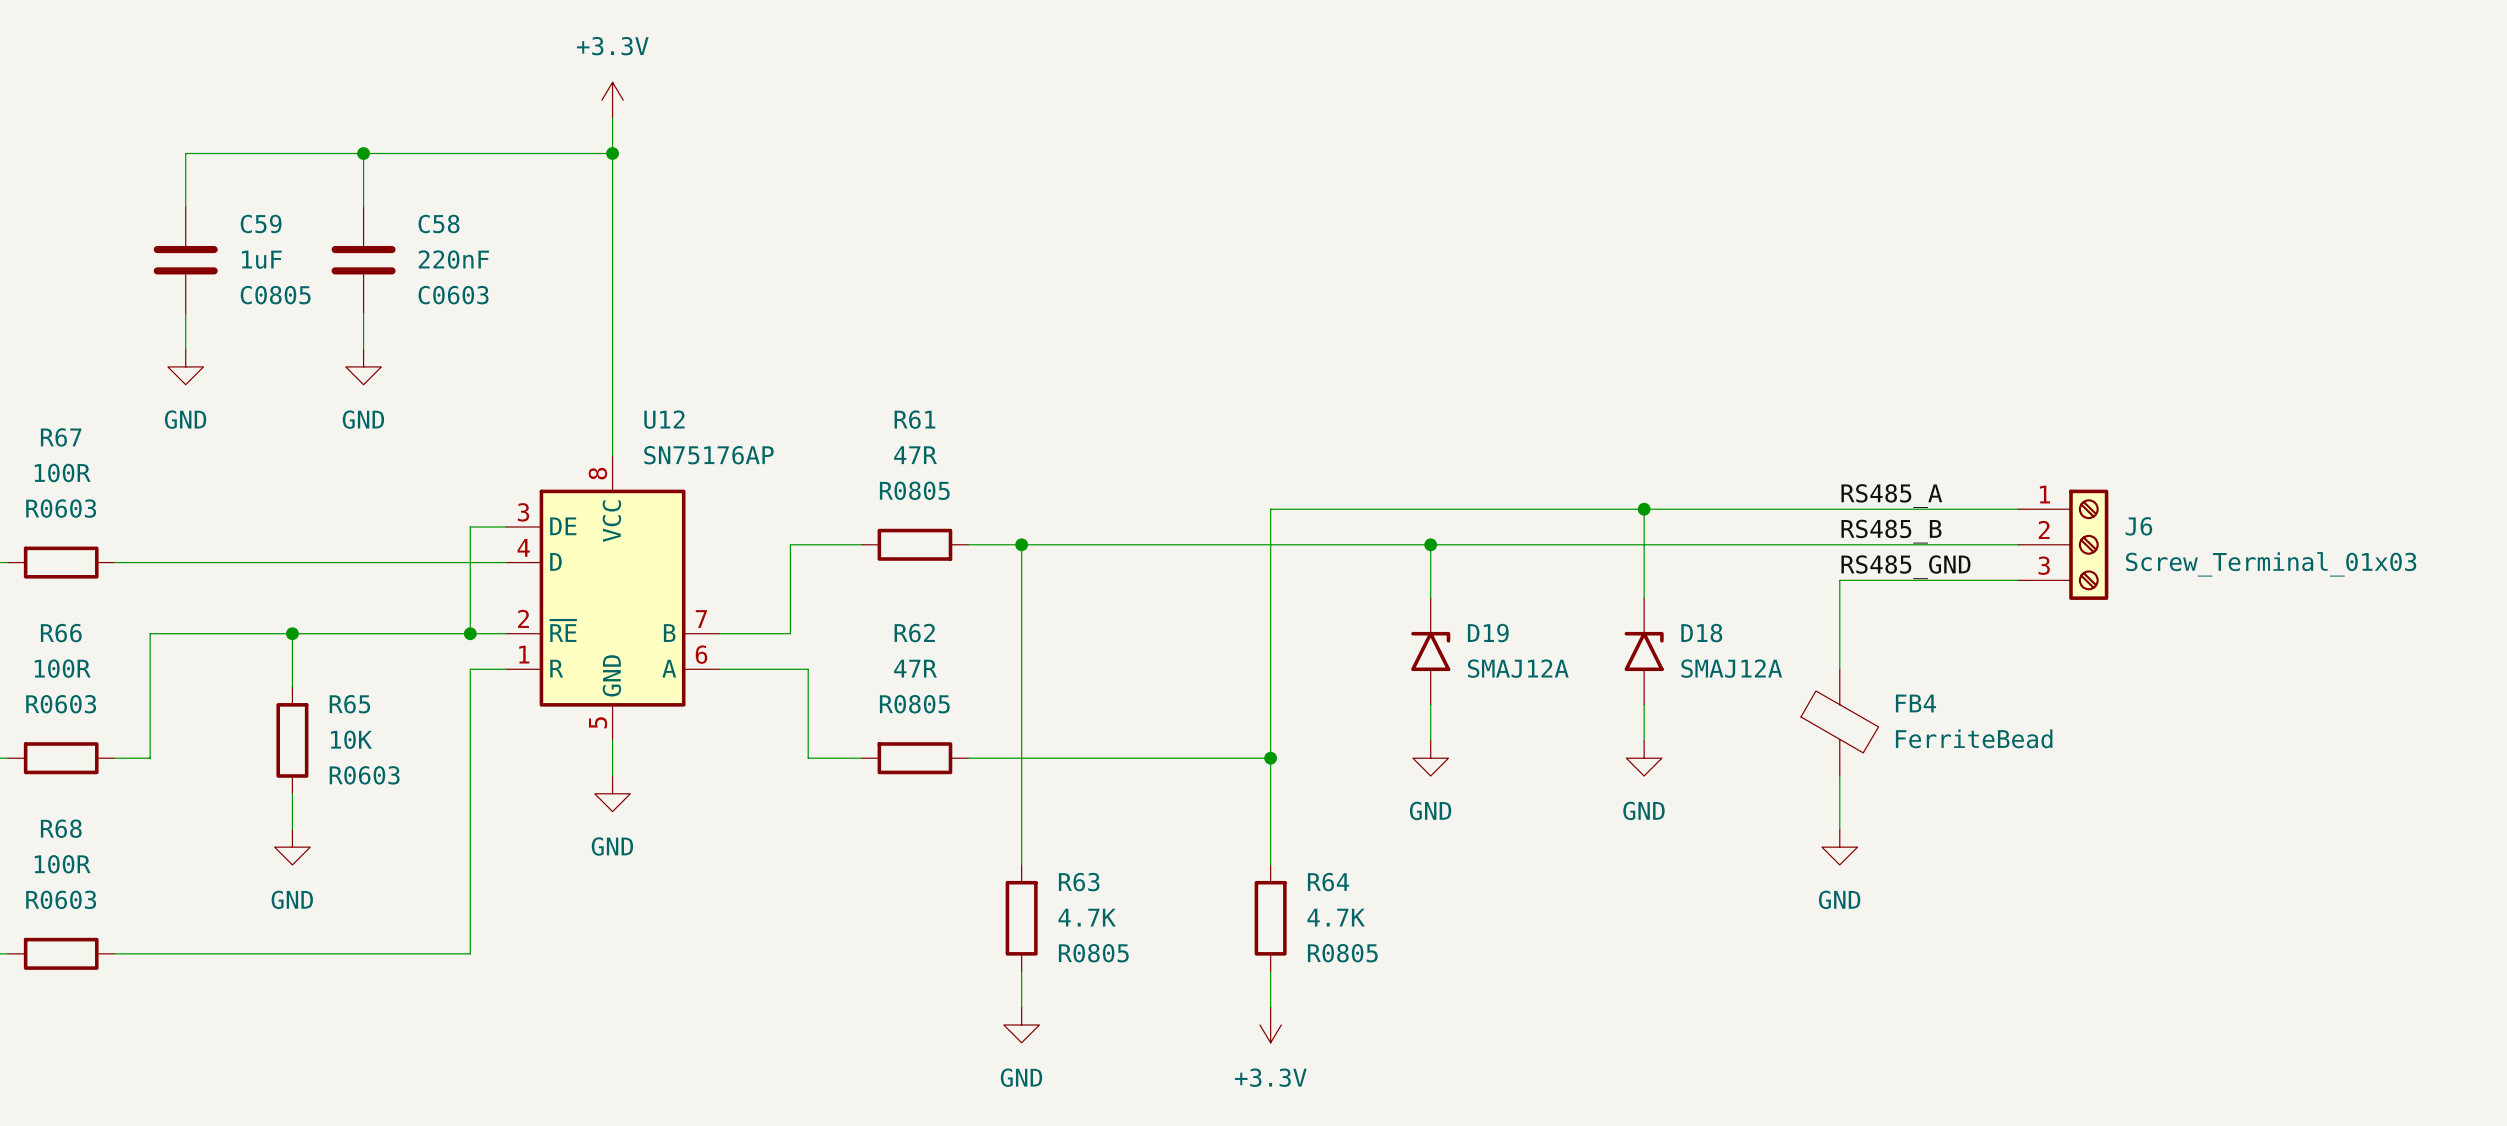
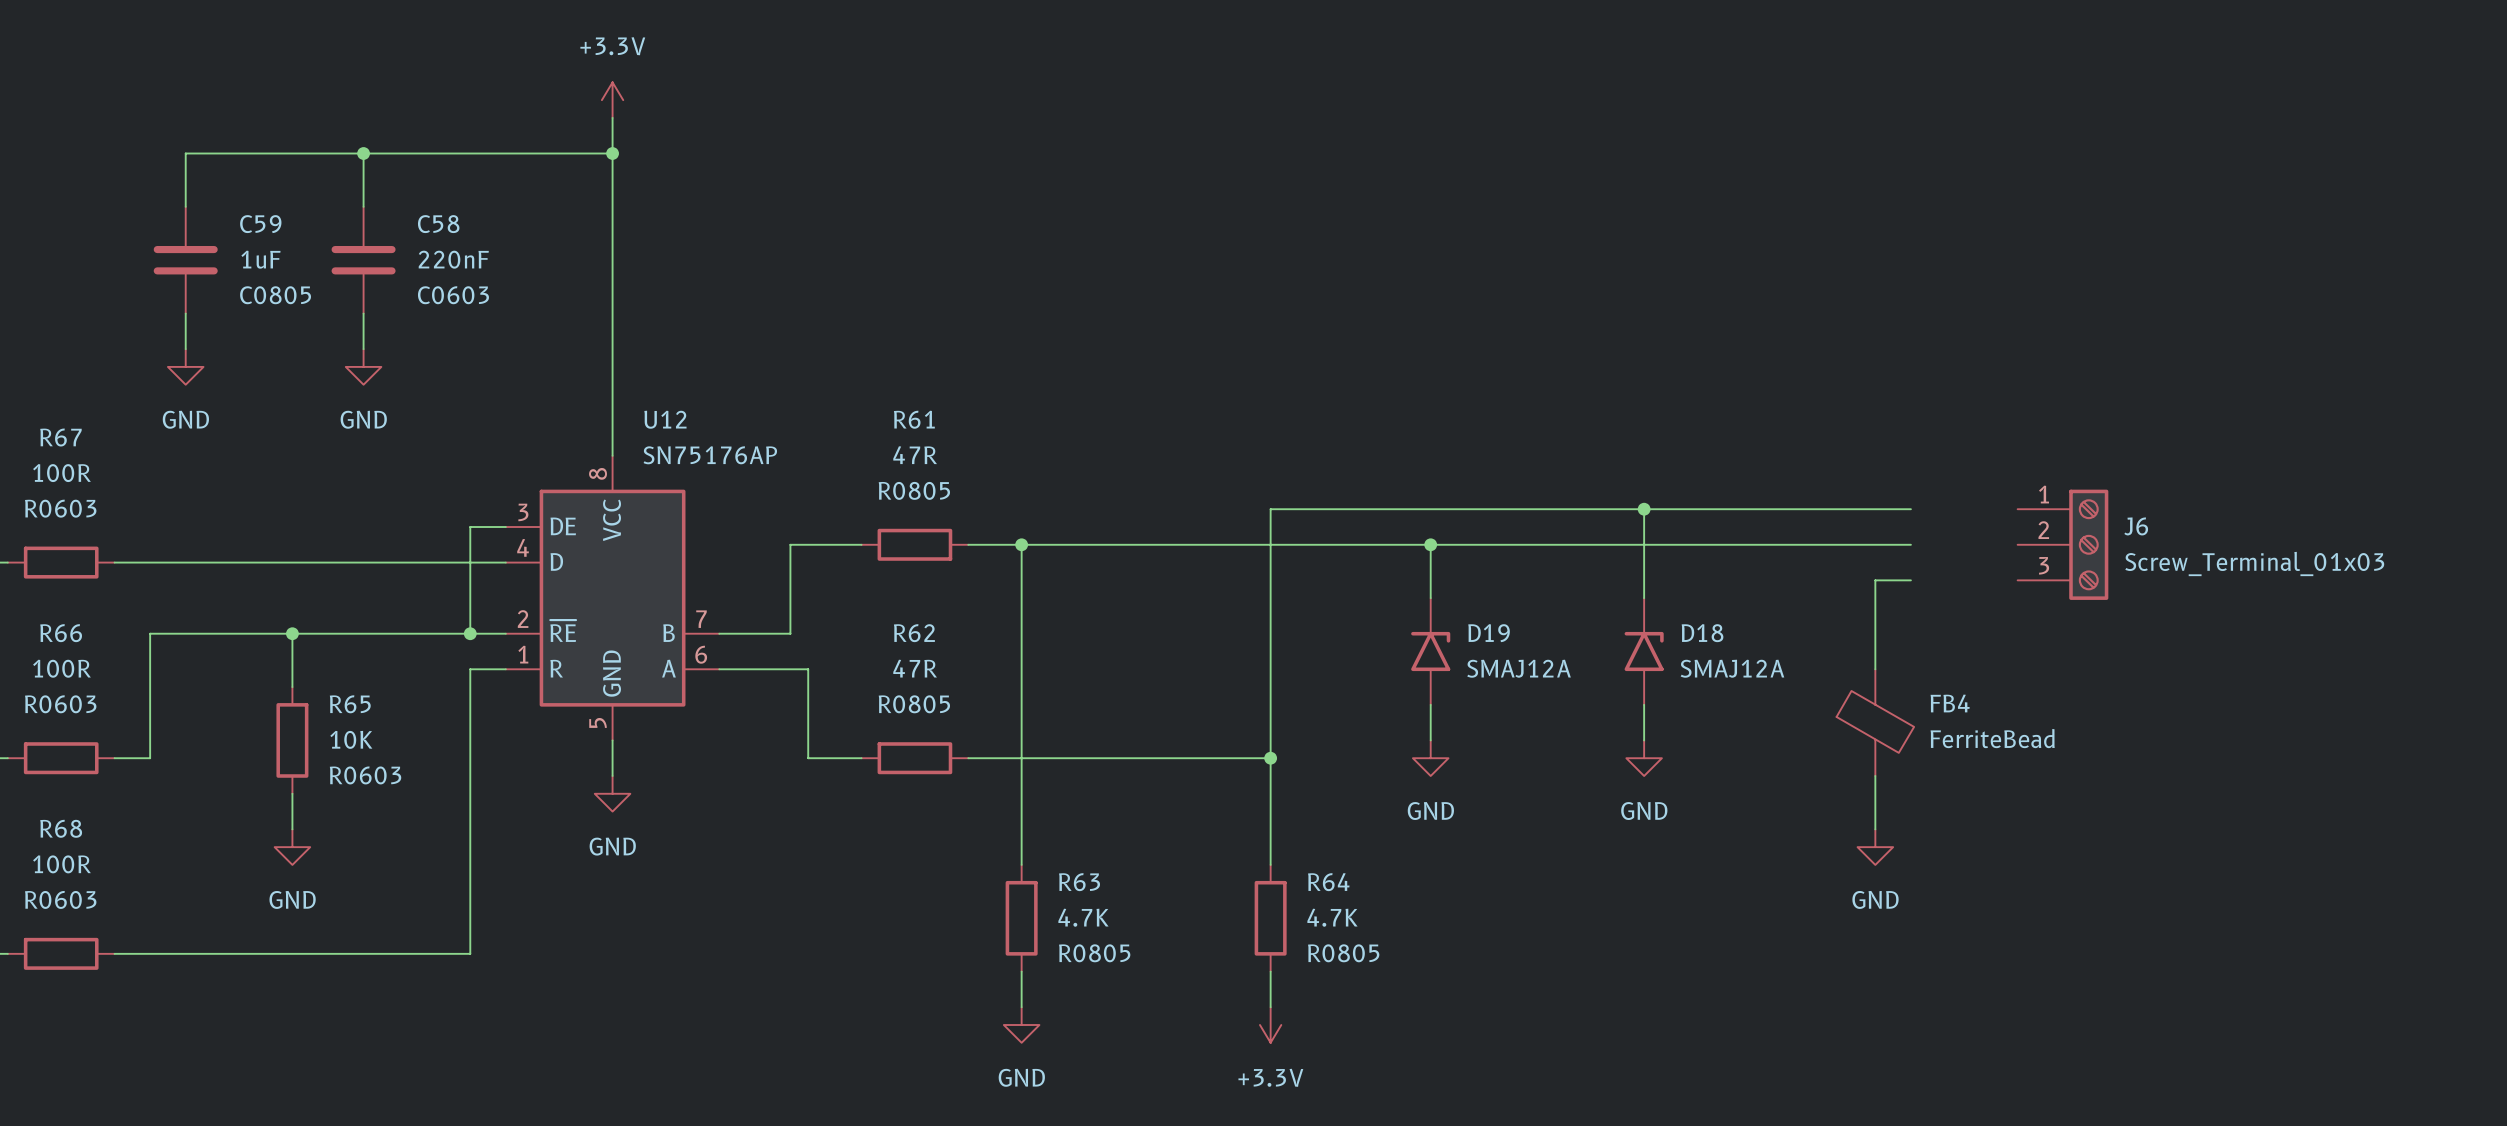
label: RS485_A (1891, 496) -> none
wire: (1910, 509) (2017, 509) -> none
label: RS485_B (1891, 531) -> none
wire: (1910, 544) (2017, 544) -> none
label: RS485_GND (1905, 567) -> none
wire: (1875, 580) (1839, 580) (1839, 669) -> (1875, 580) (1875, 669)
wire: (1910, 580) (2017, 580) -> none
FB4 position: (1839, 722) -> (1875, 722)
wire: (1839, 776) (1839, 829) -> (1875, 776) (1875, 829)
power symbol position: GND (1839, 847) -> GND (1875, 847)

